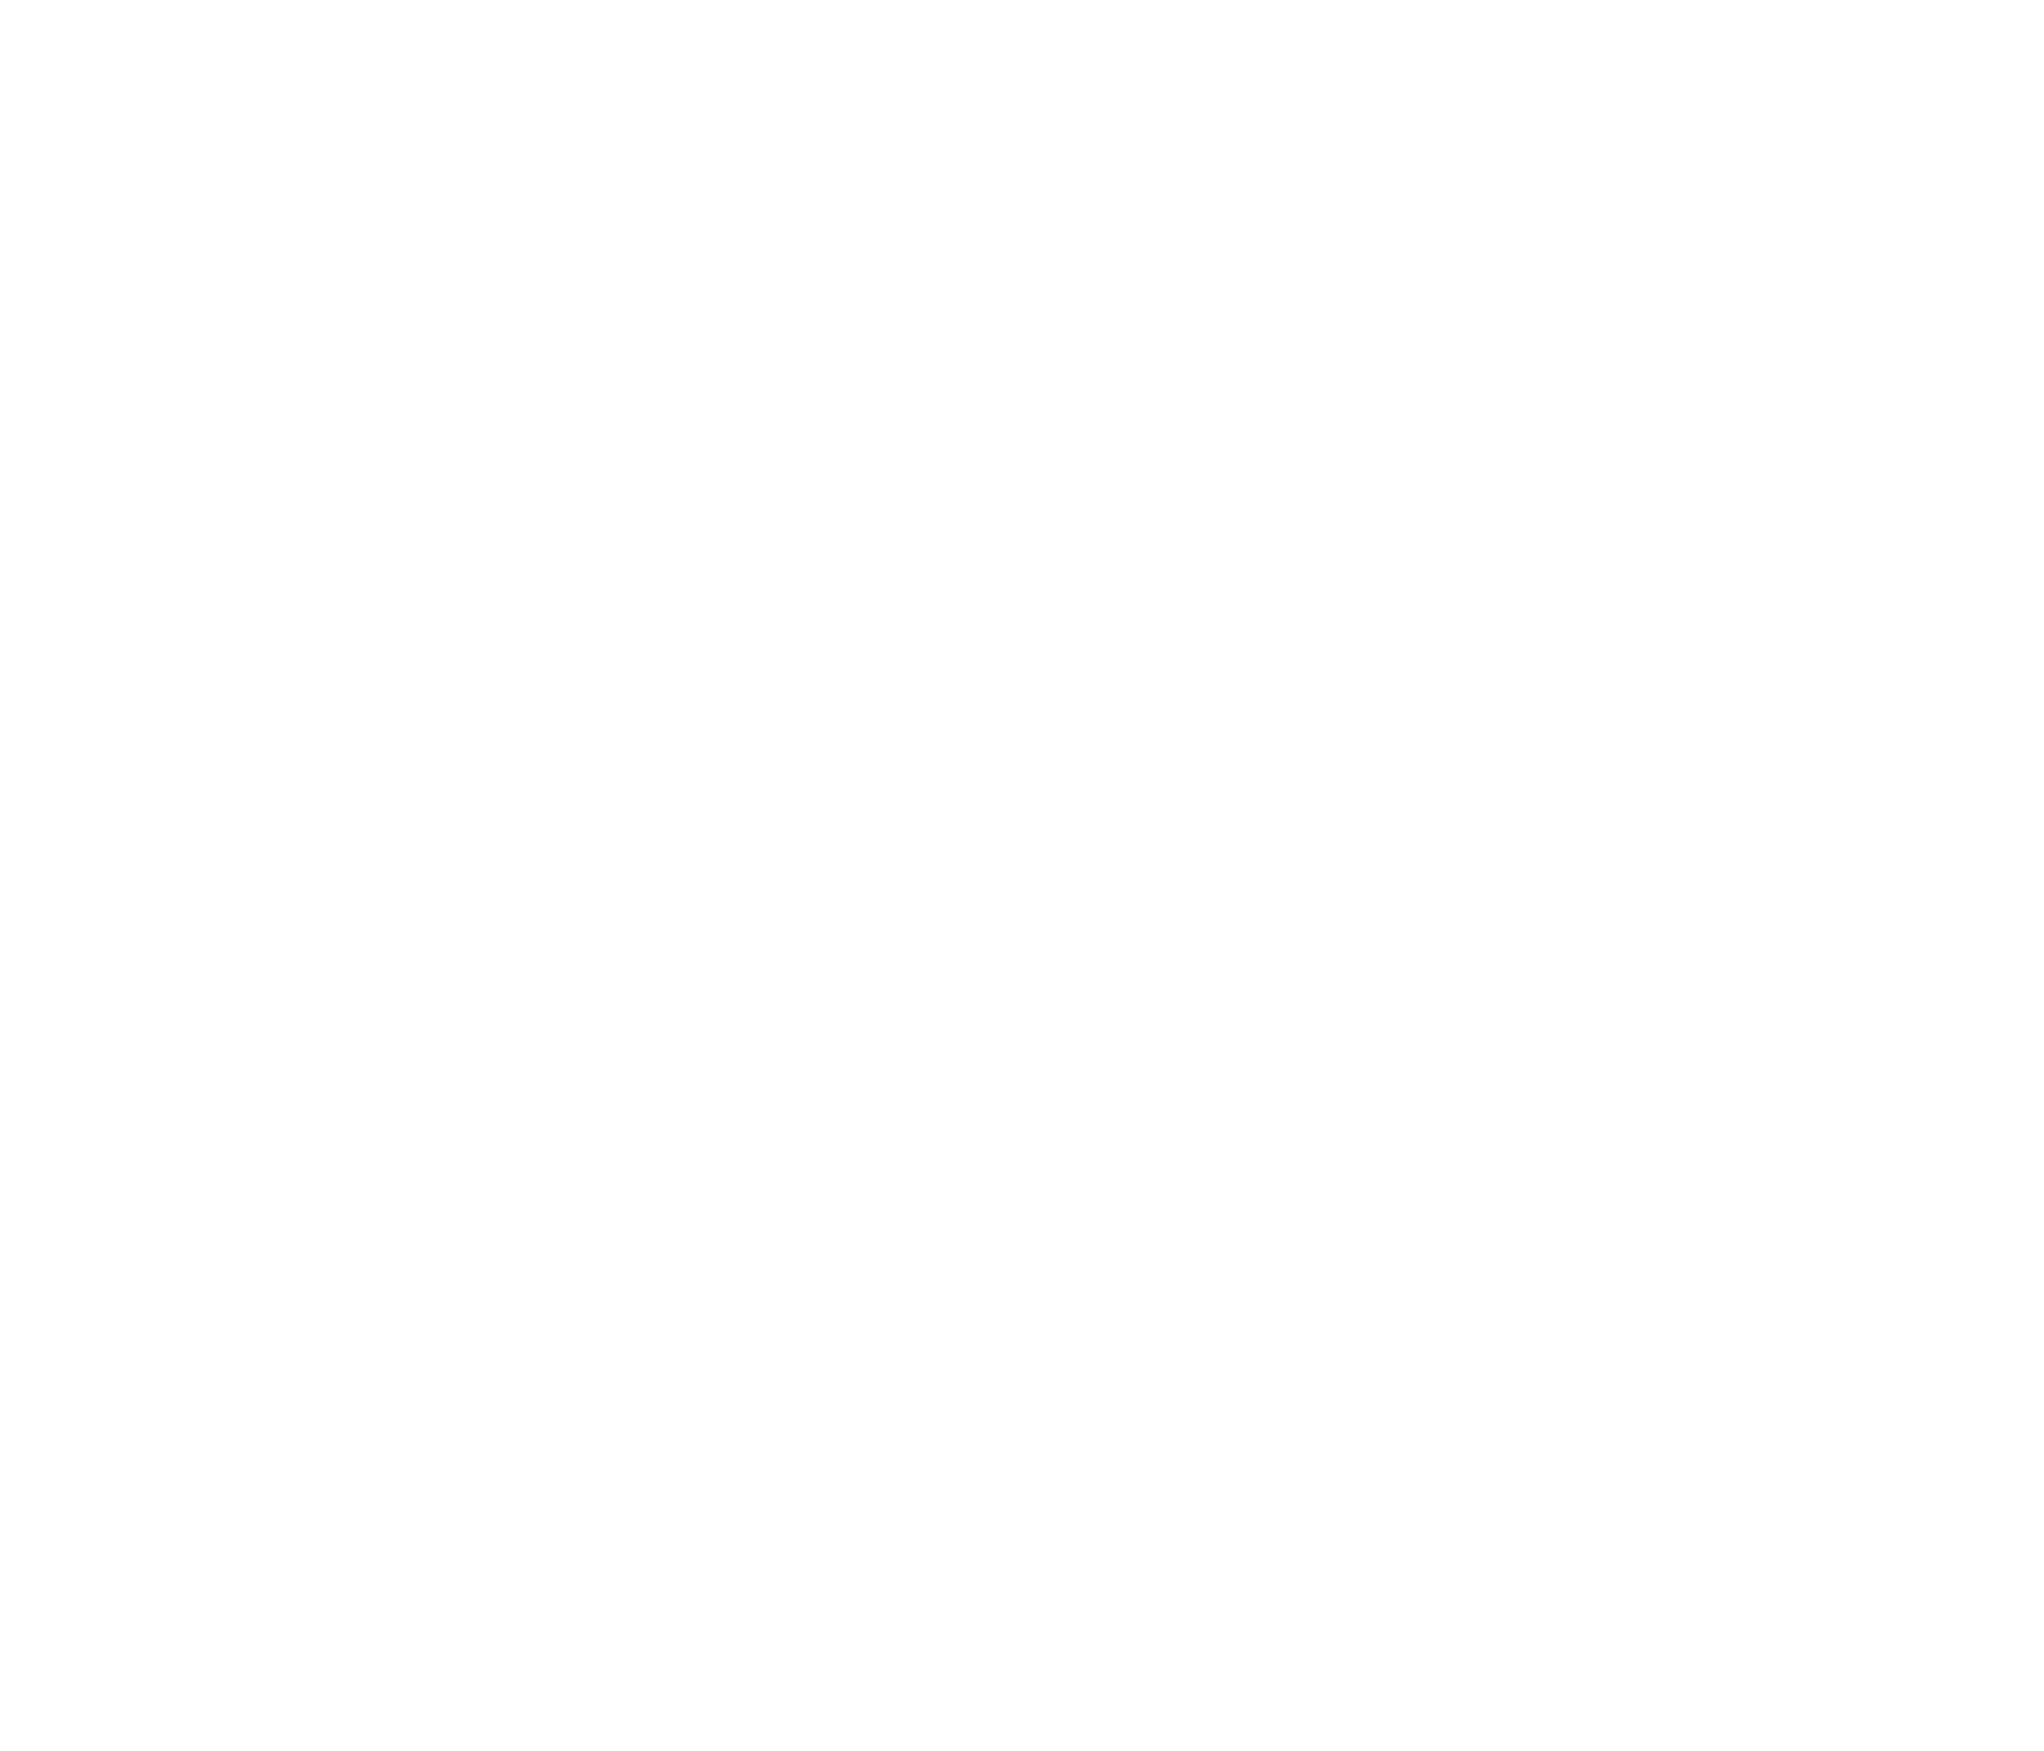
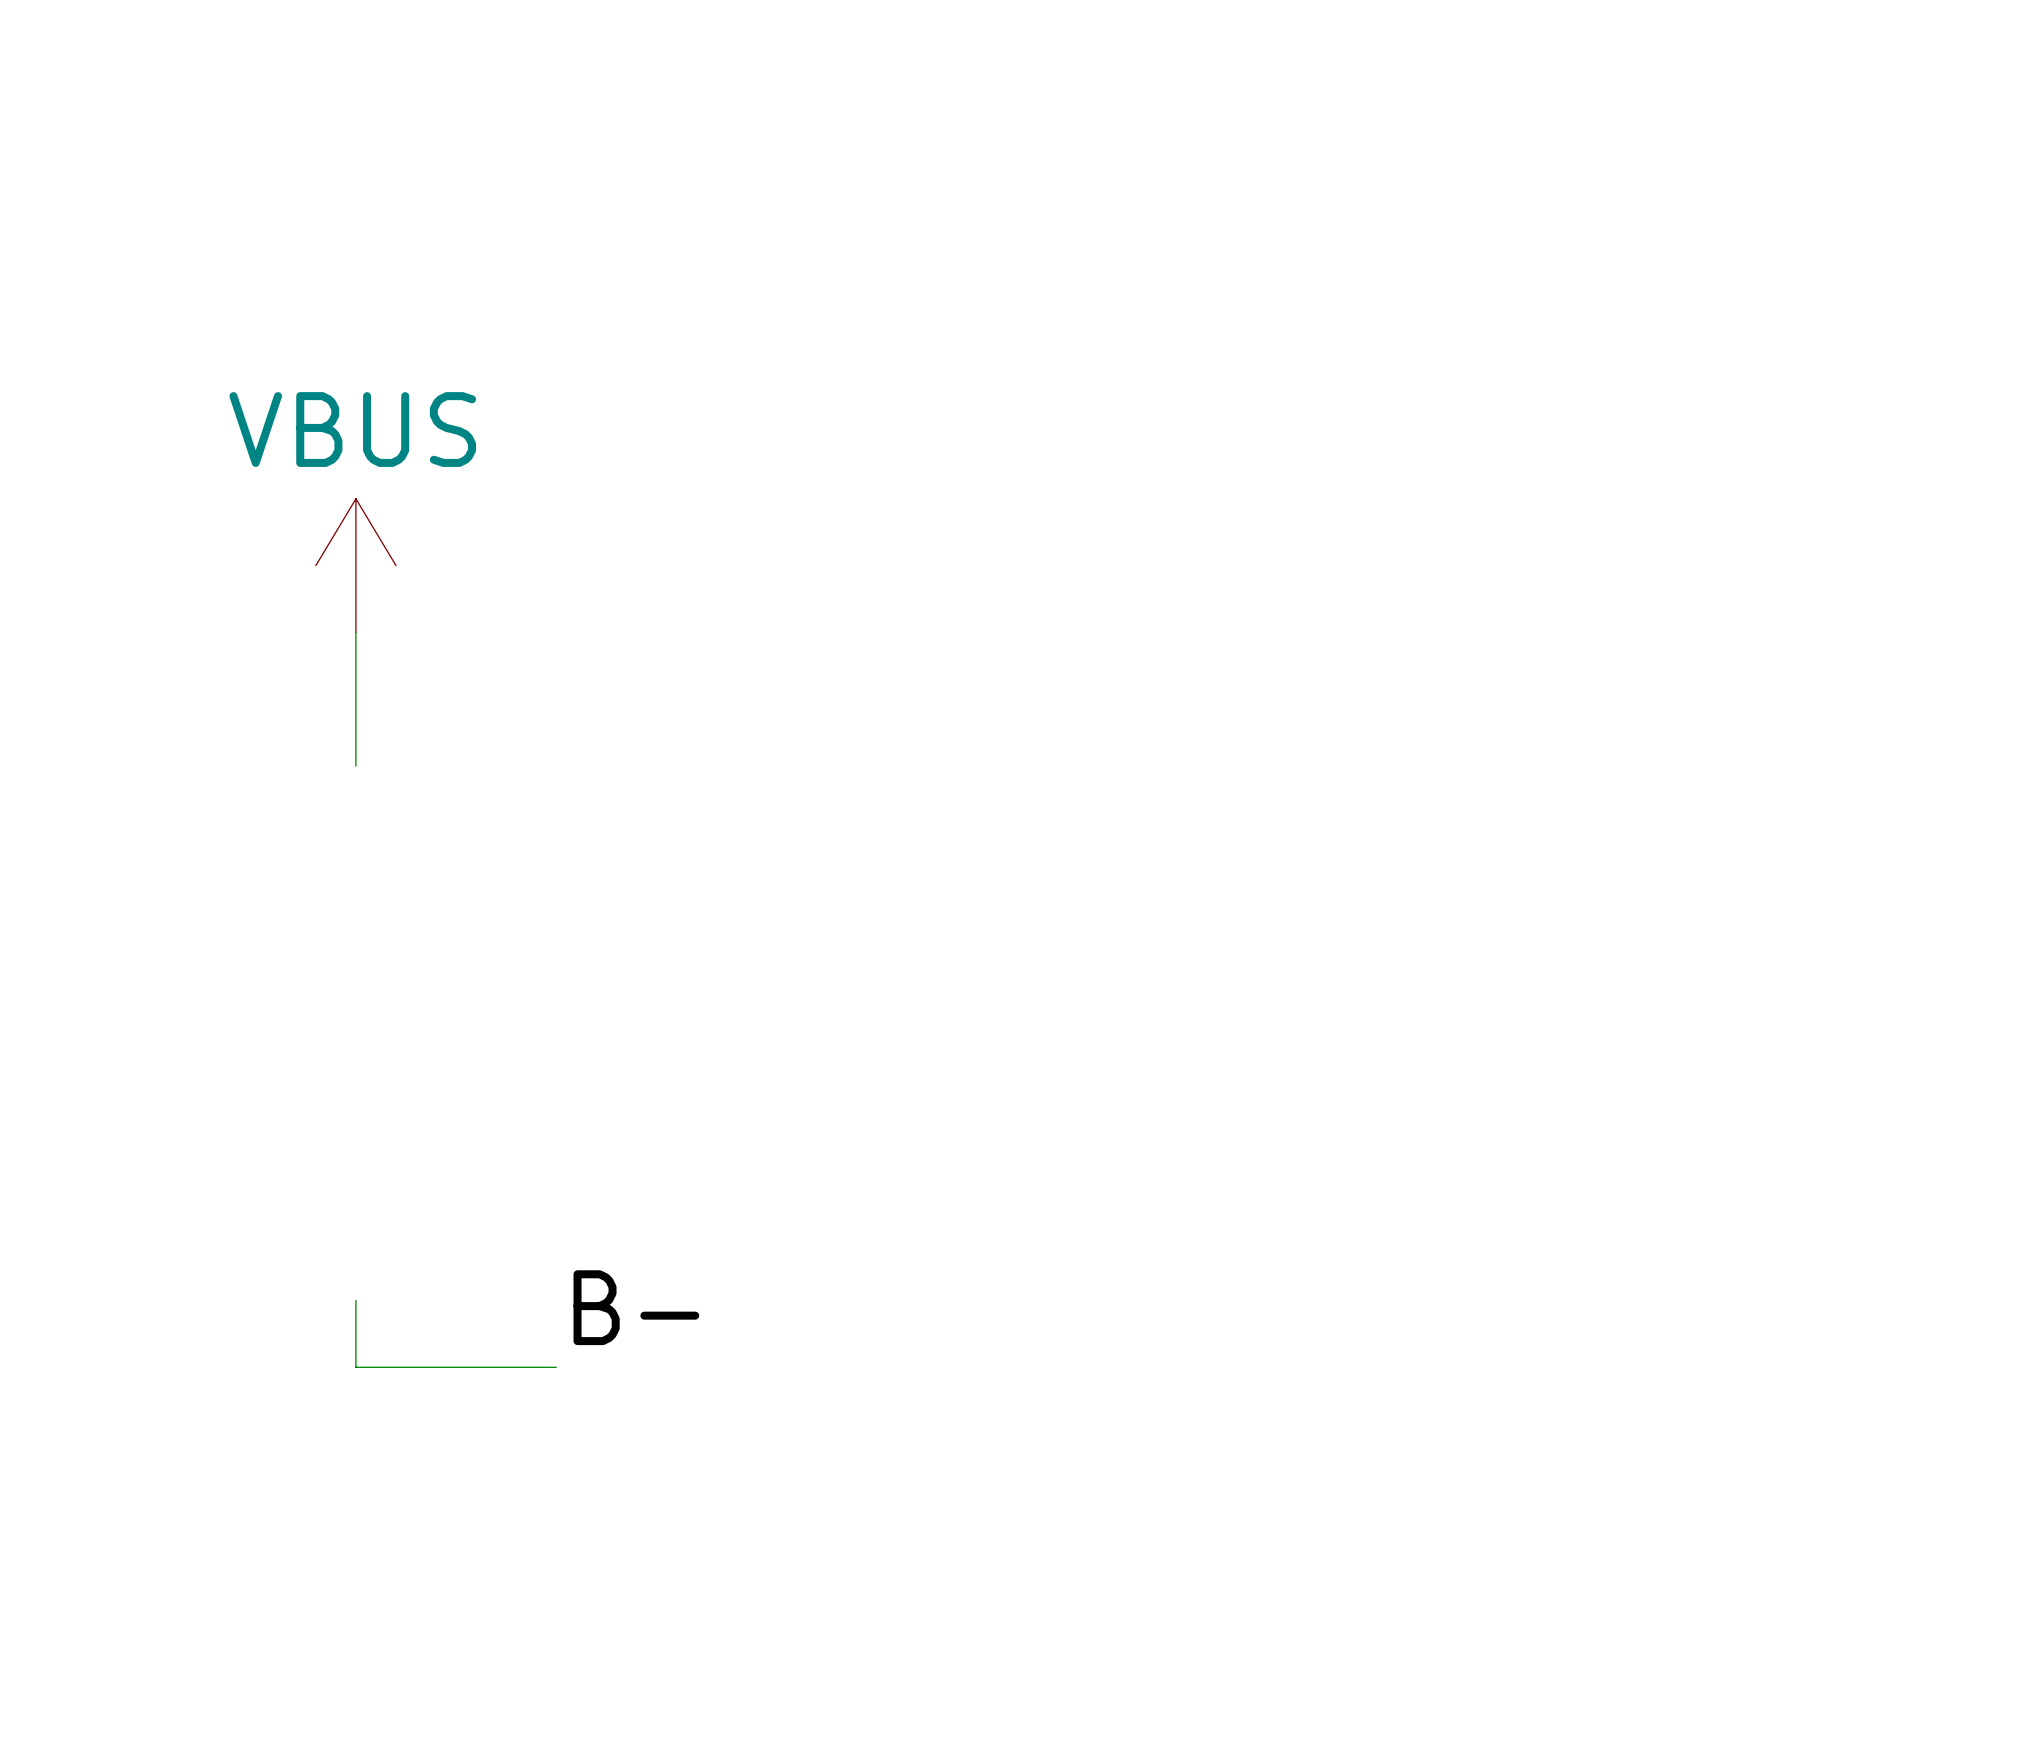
power symbol: none -> VBUS (355, 565)
wire: none -> (355, 632) (355, 766)
wire: none -> (355, 1300) (355, 1367) (556, 1367)
label: none -> B- (636, 1307)

